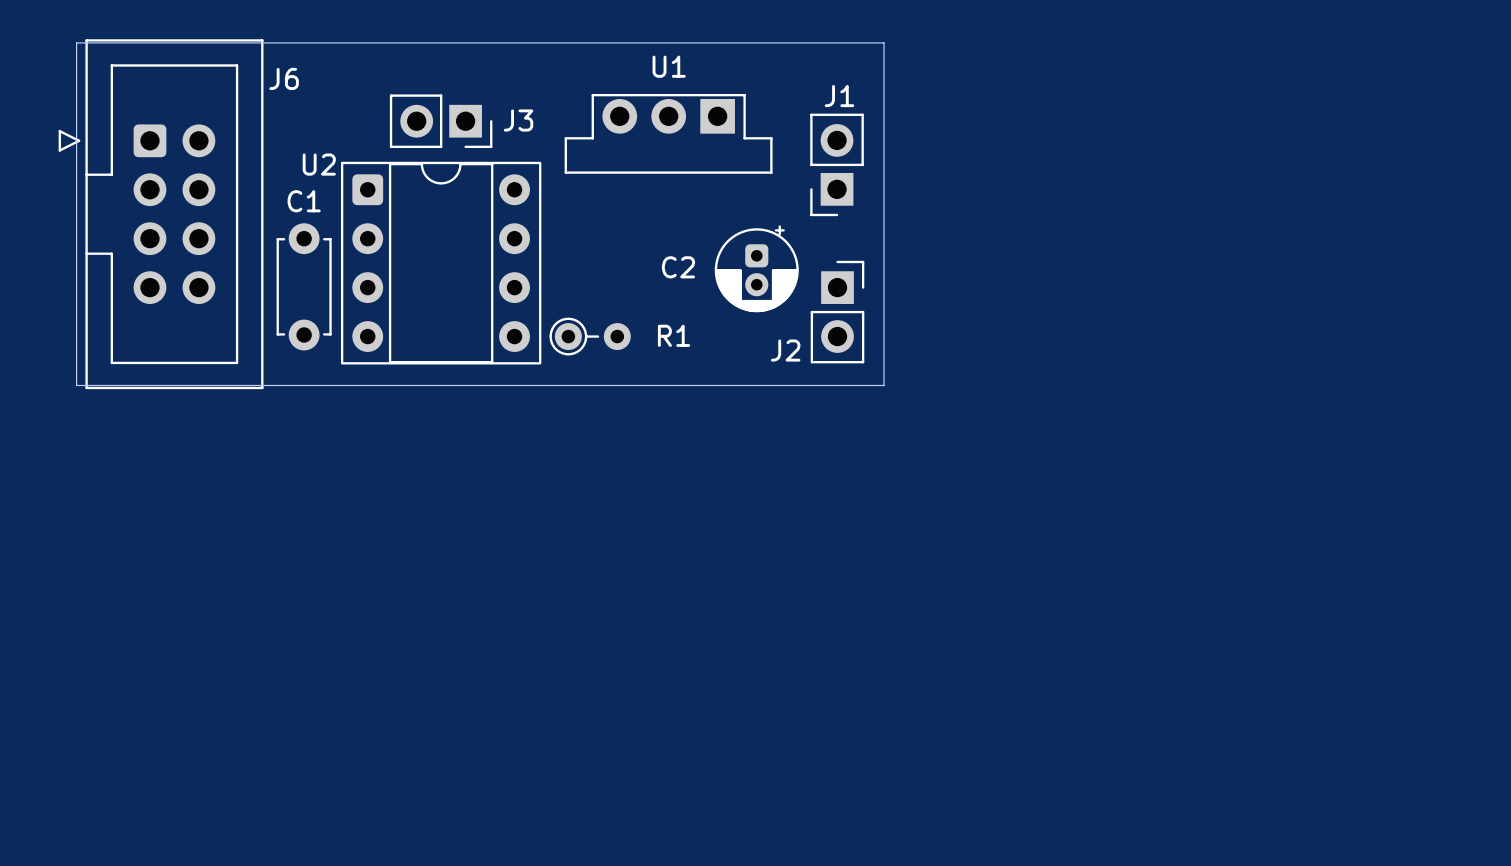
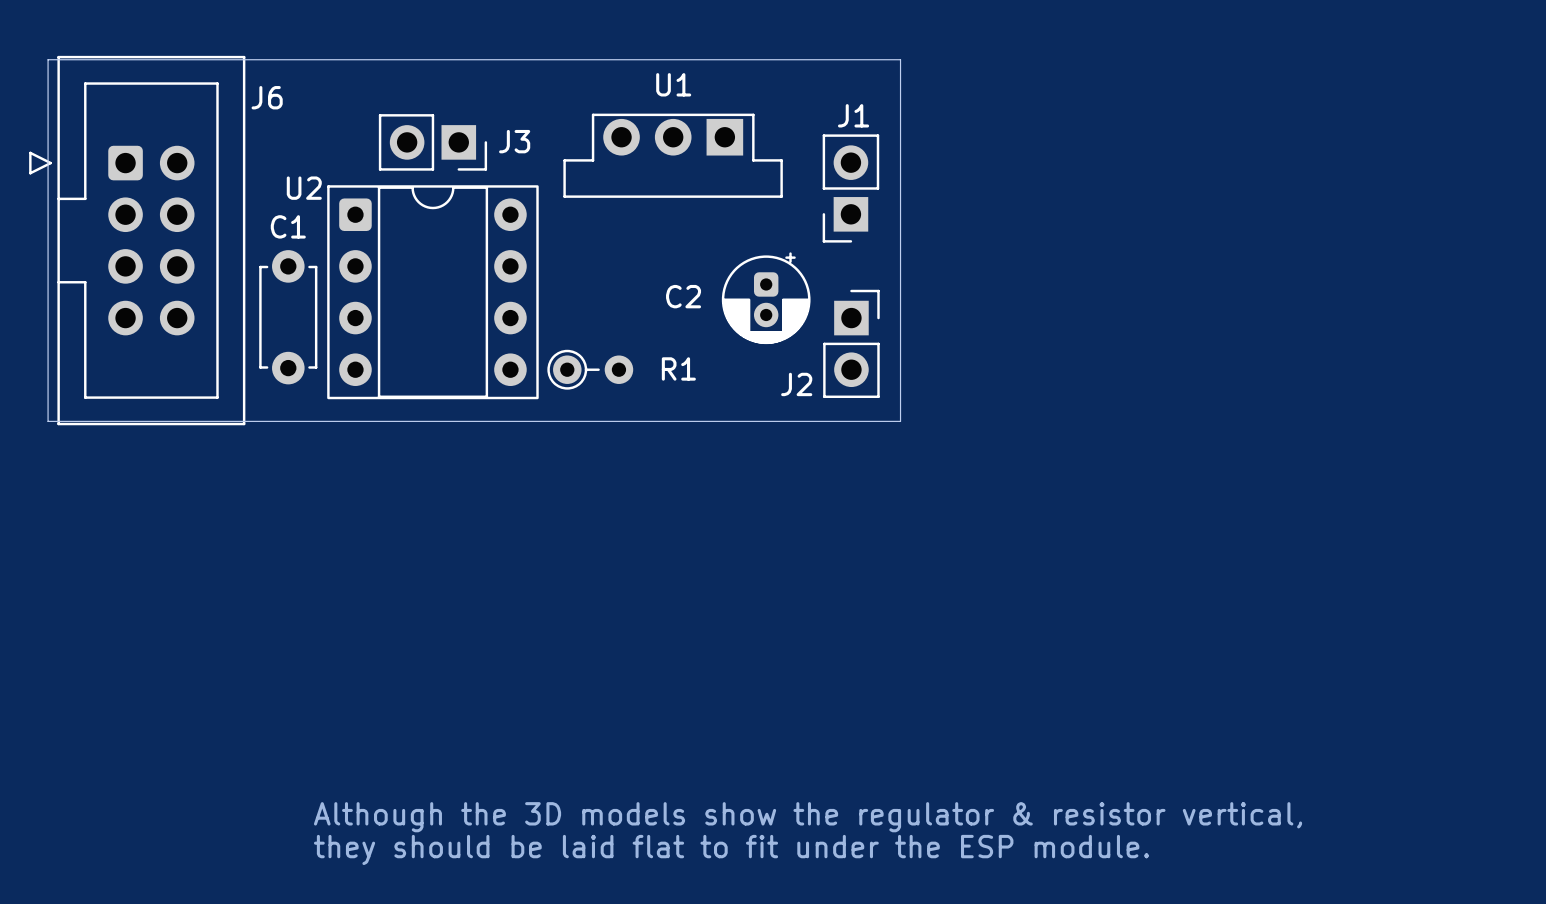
text: none -> Although the 3D models show the regulator & resistor vertical, (808, 817)
text: none -> they should be laid flat to fit under the ESP module. (731, 849)

